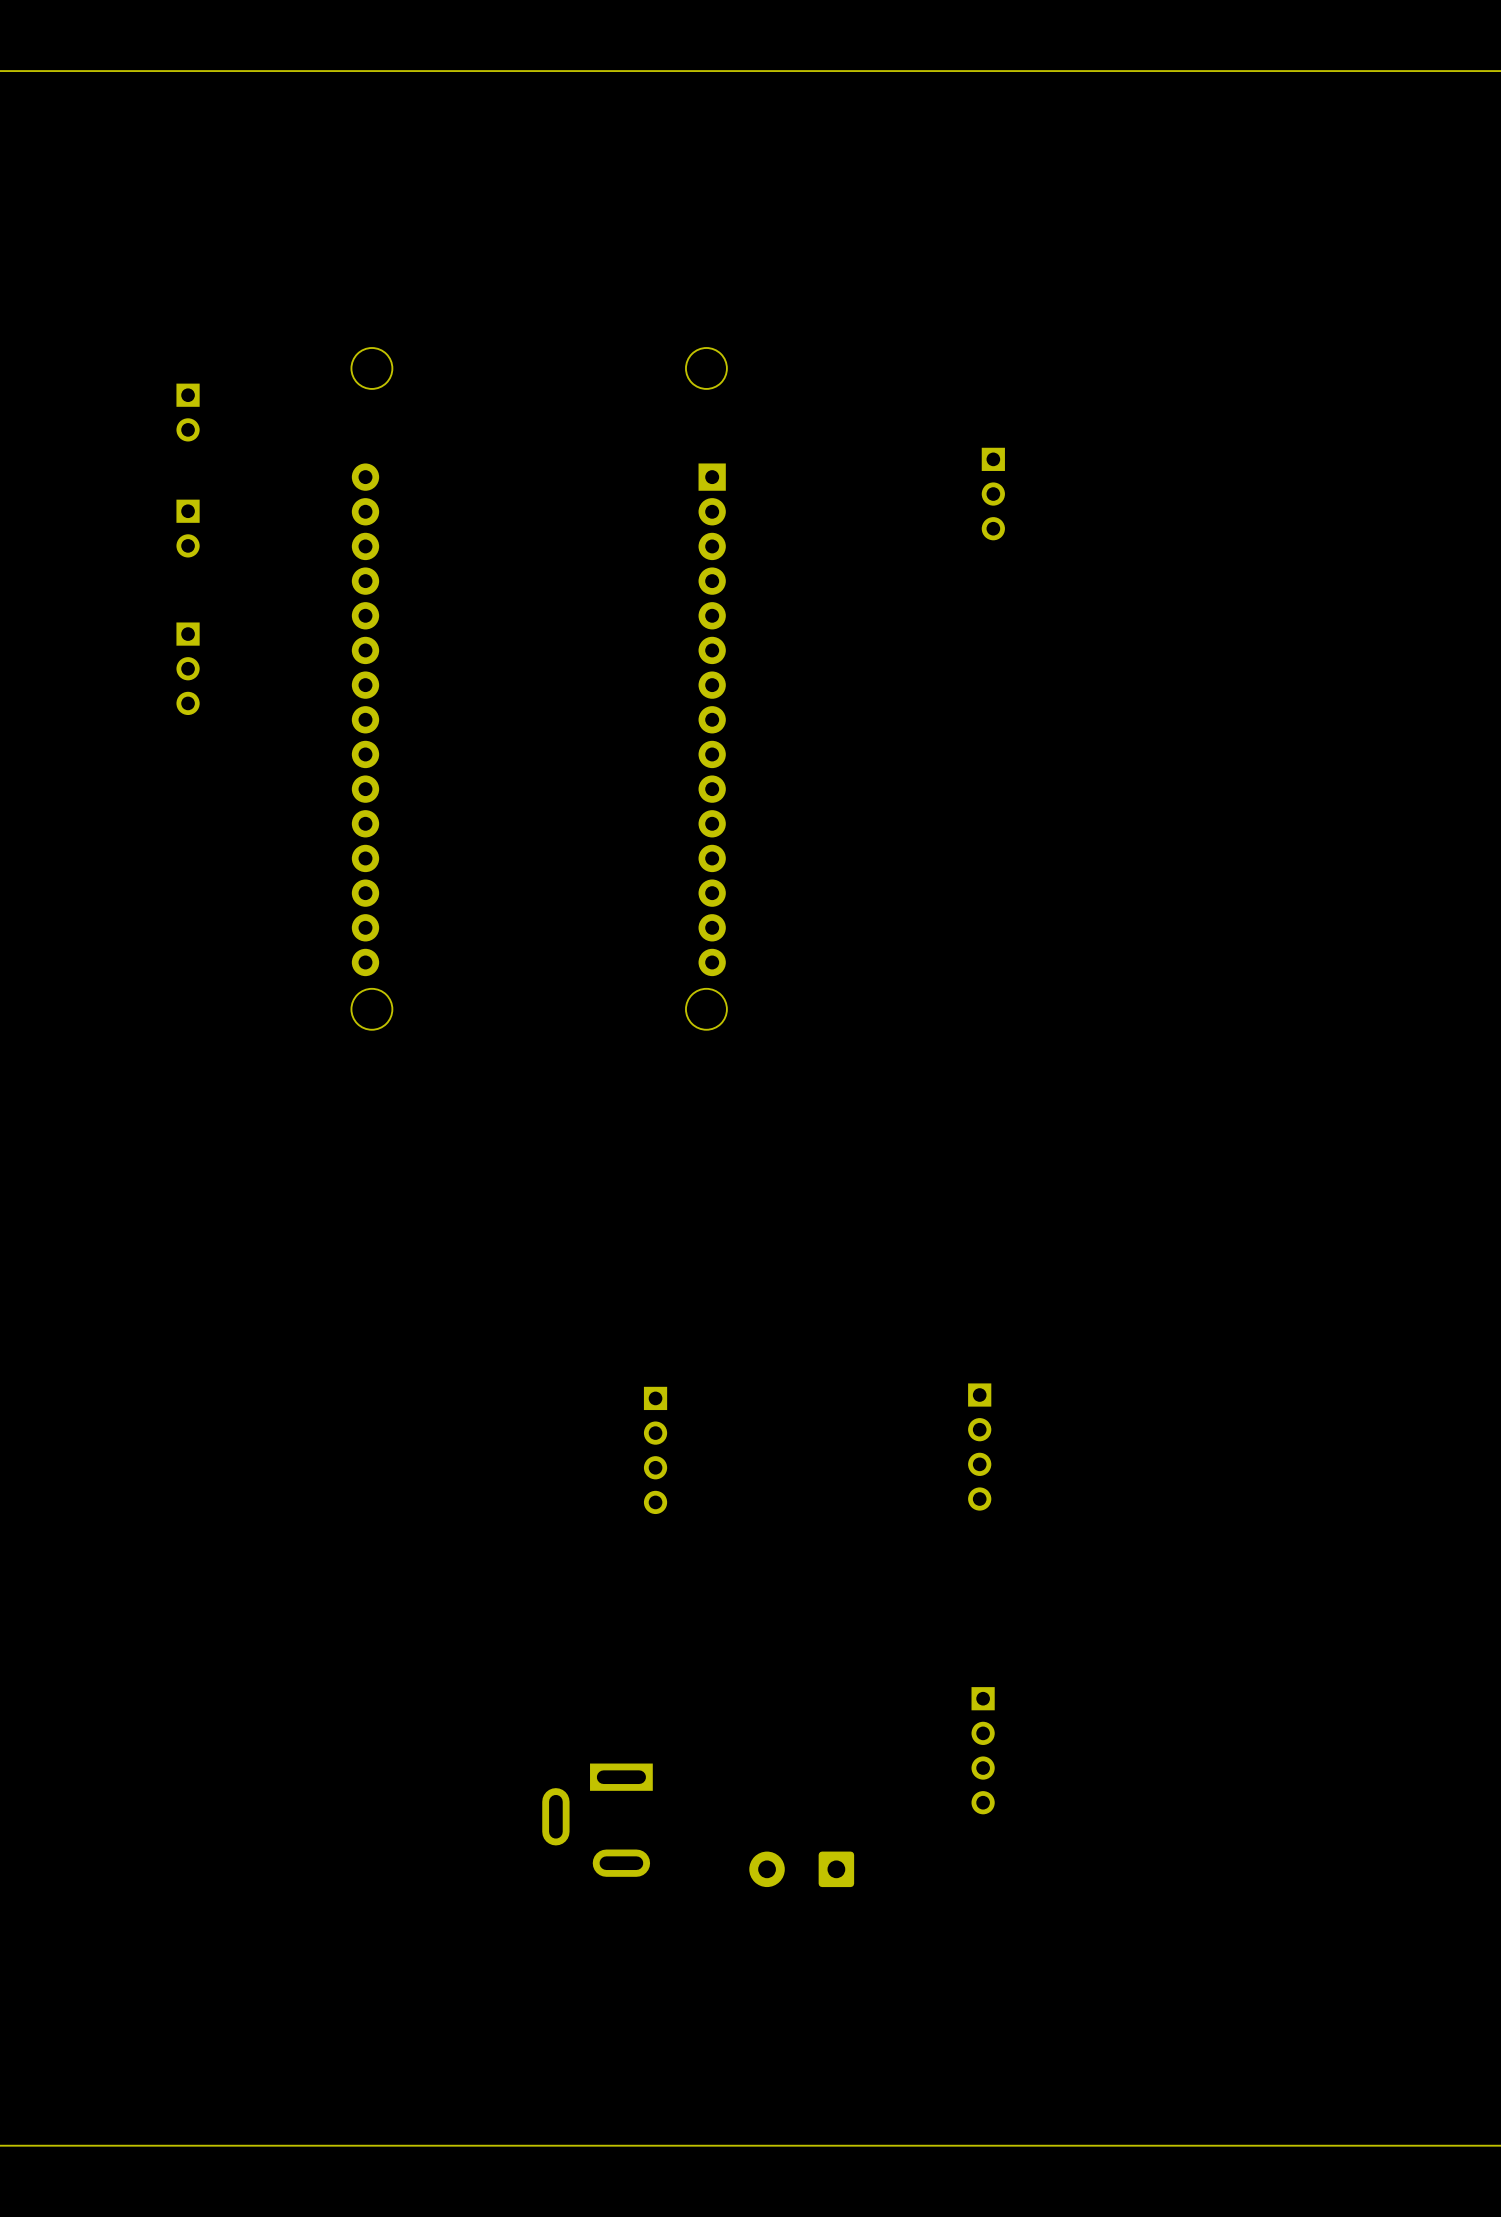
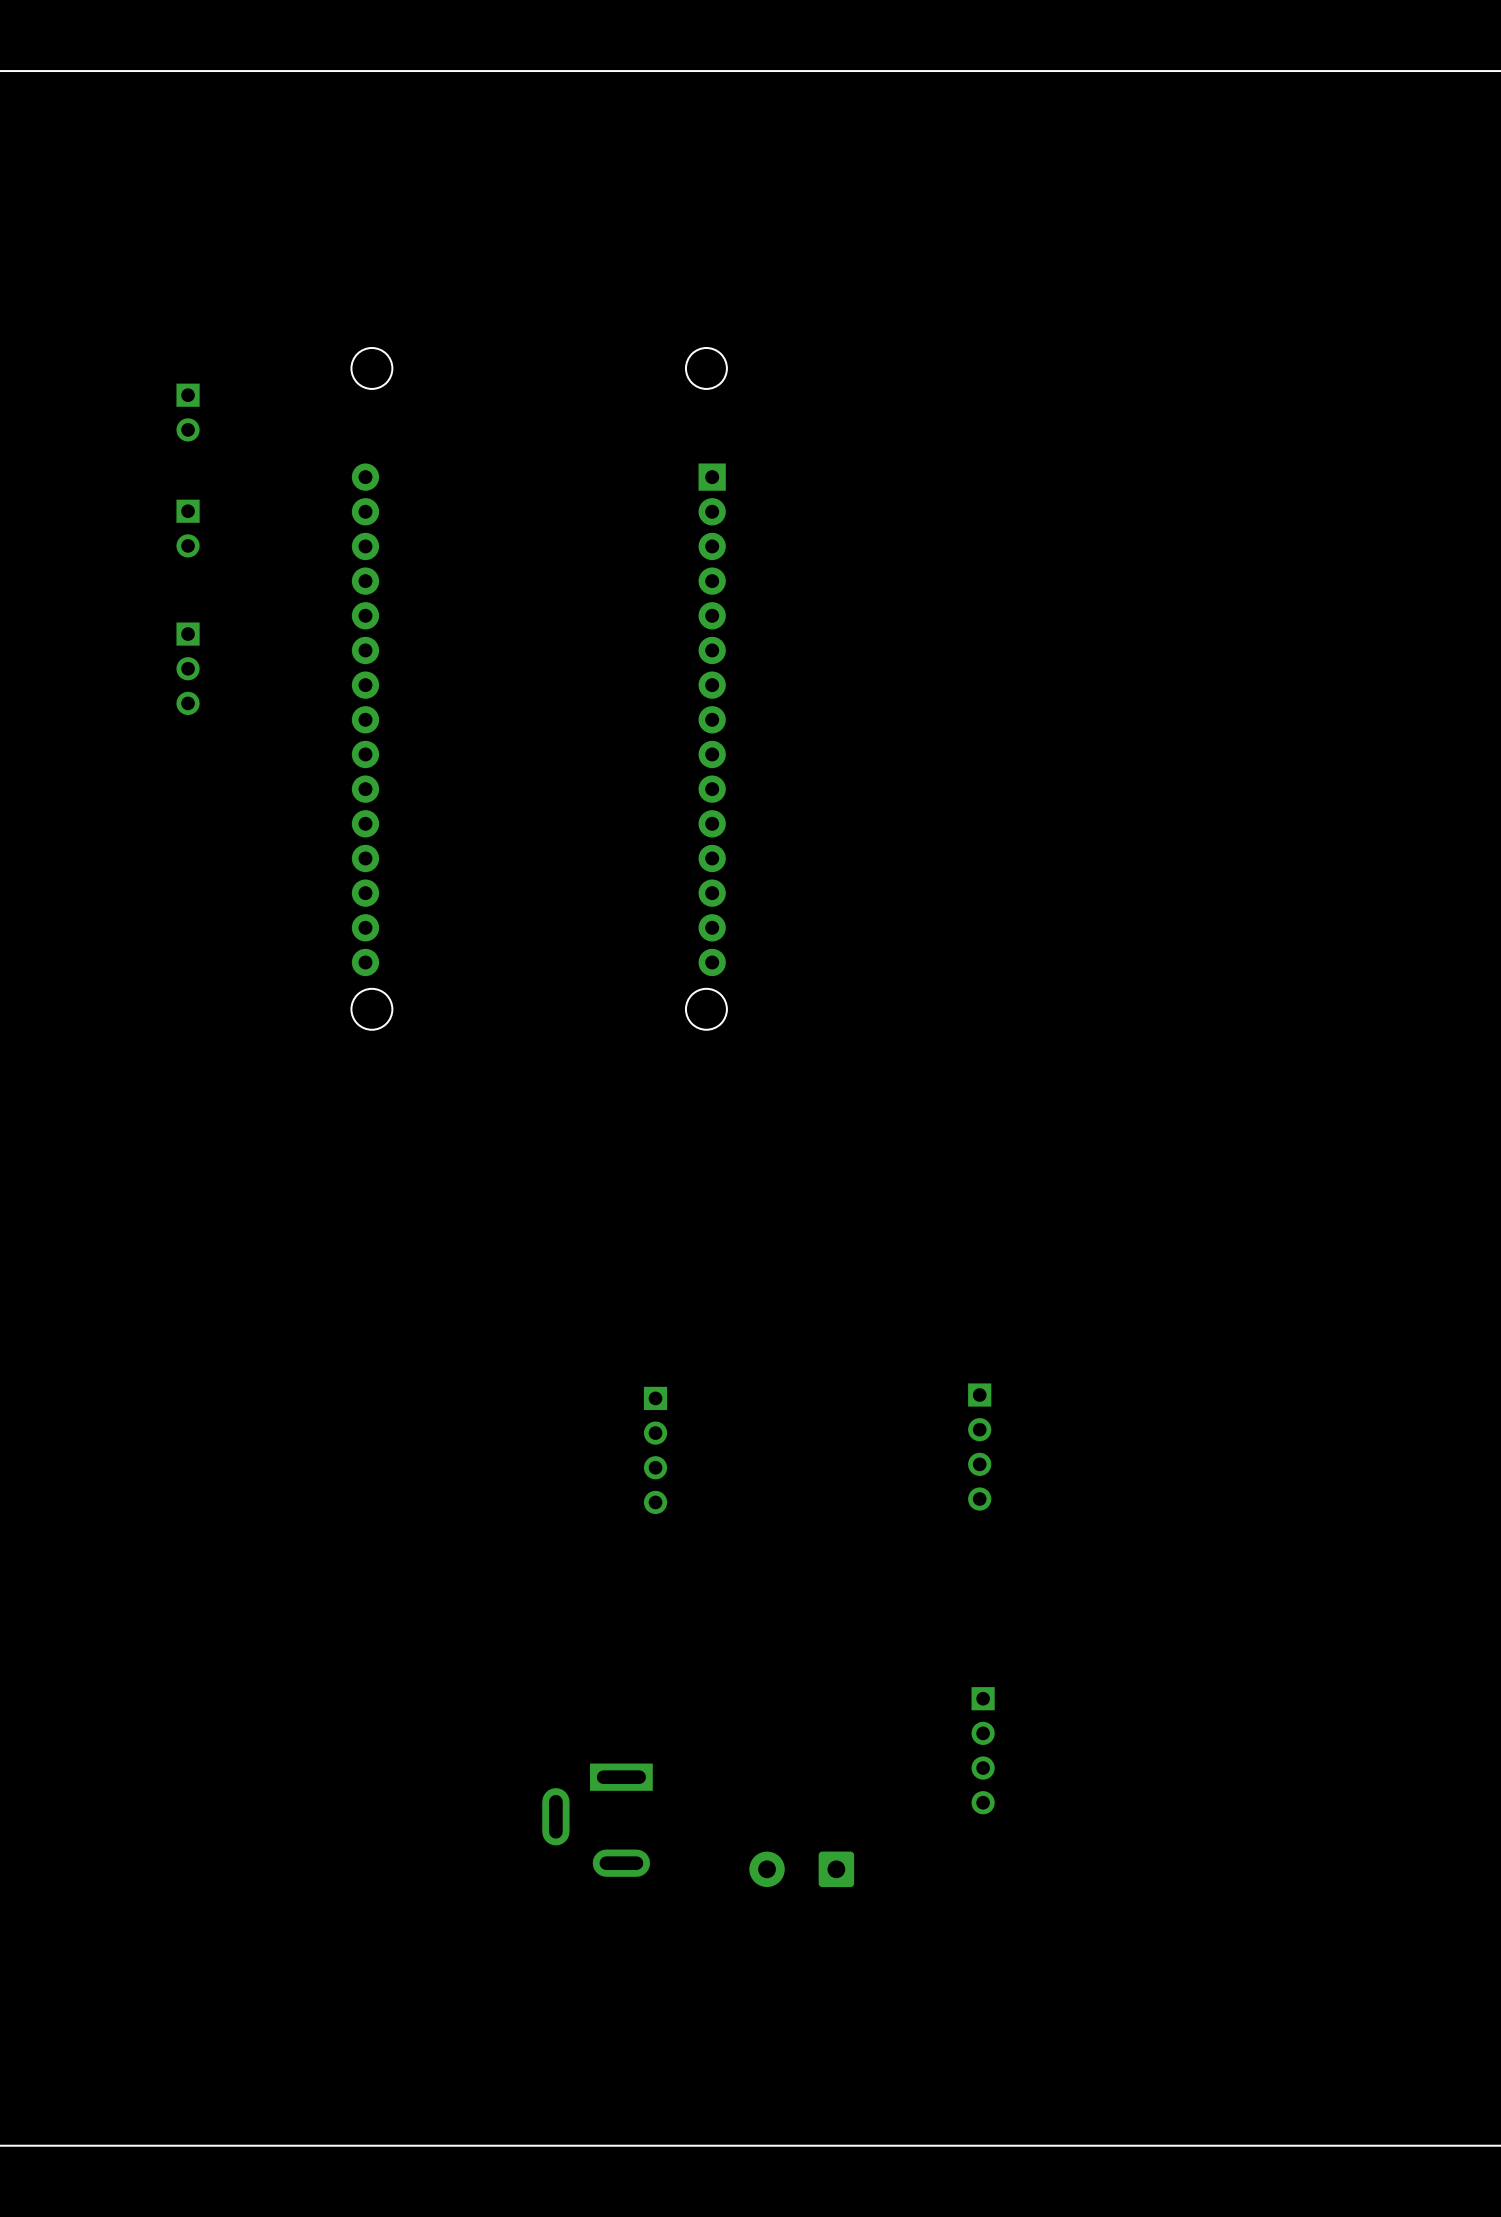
part: (993, 494) -> none

